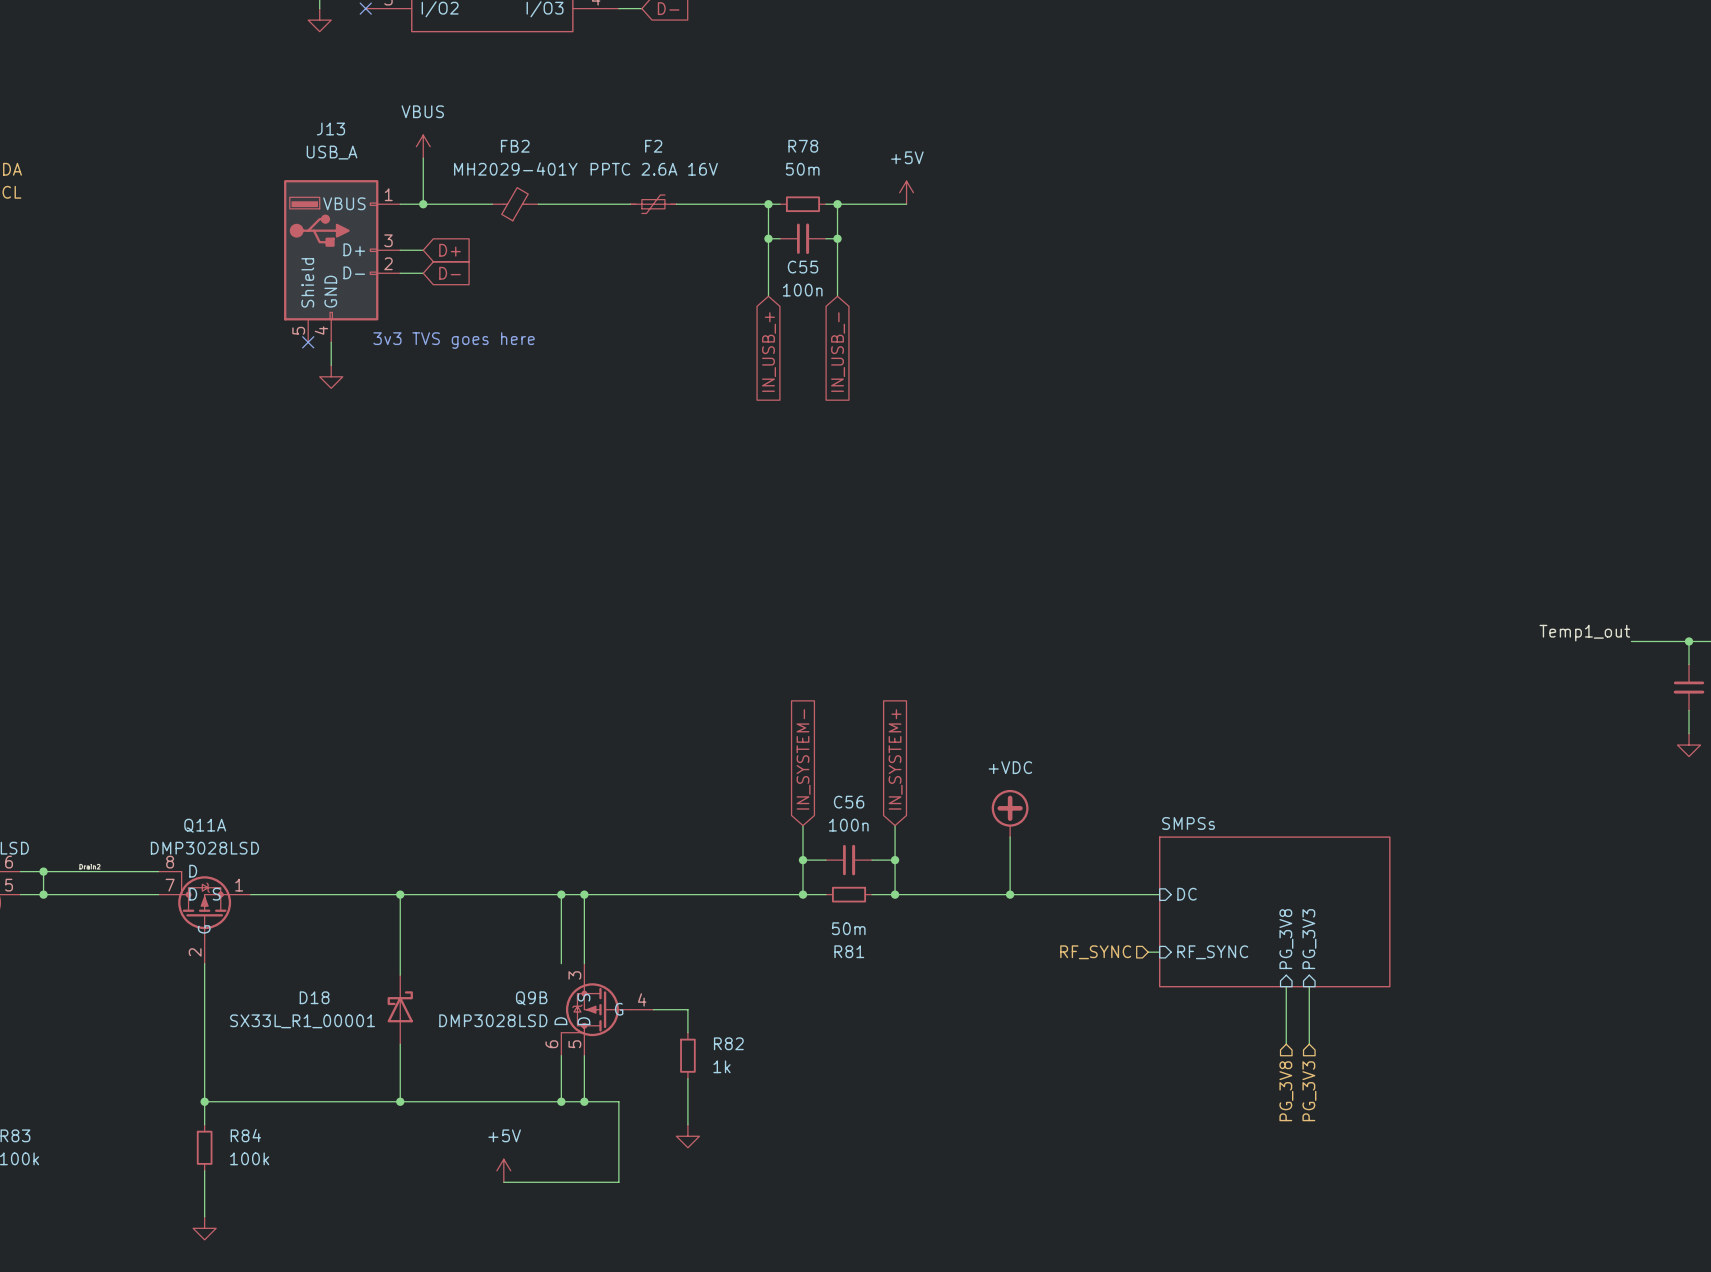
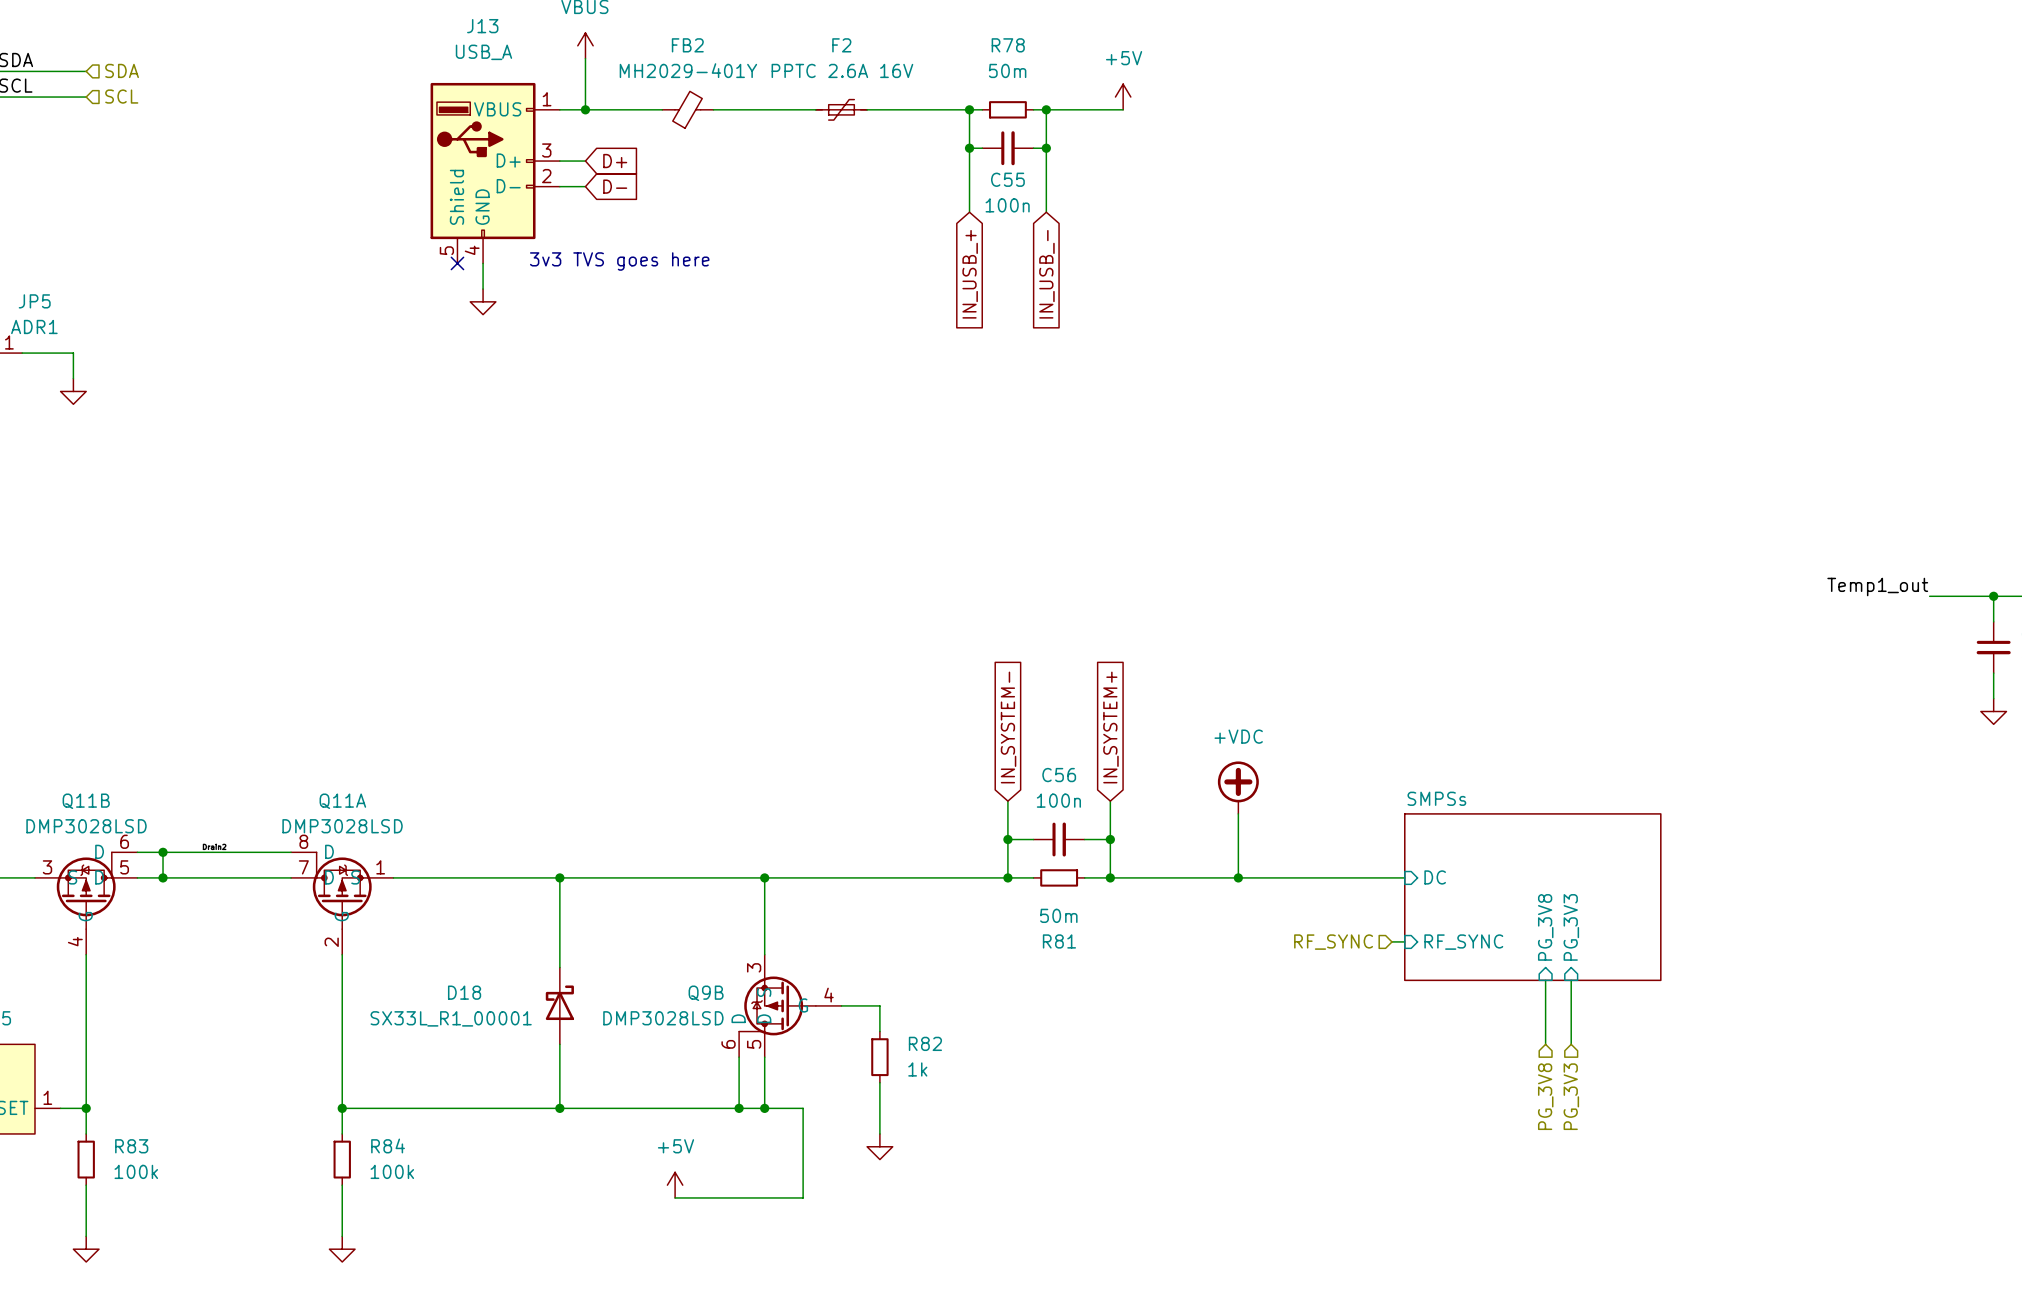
wire: (561, 894) (561, 963) -> none
junction: (561, 894) -> none

